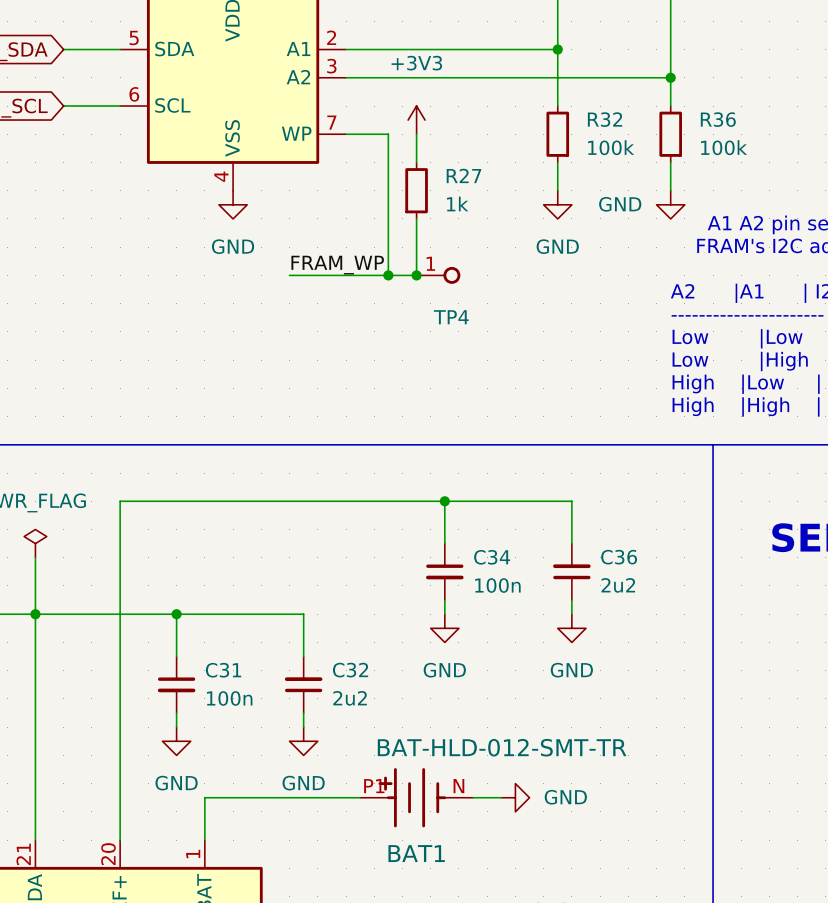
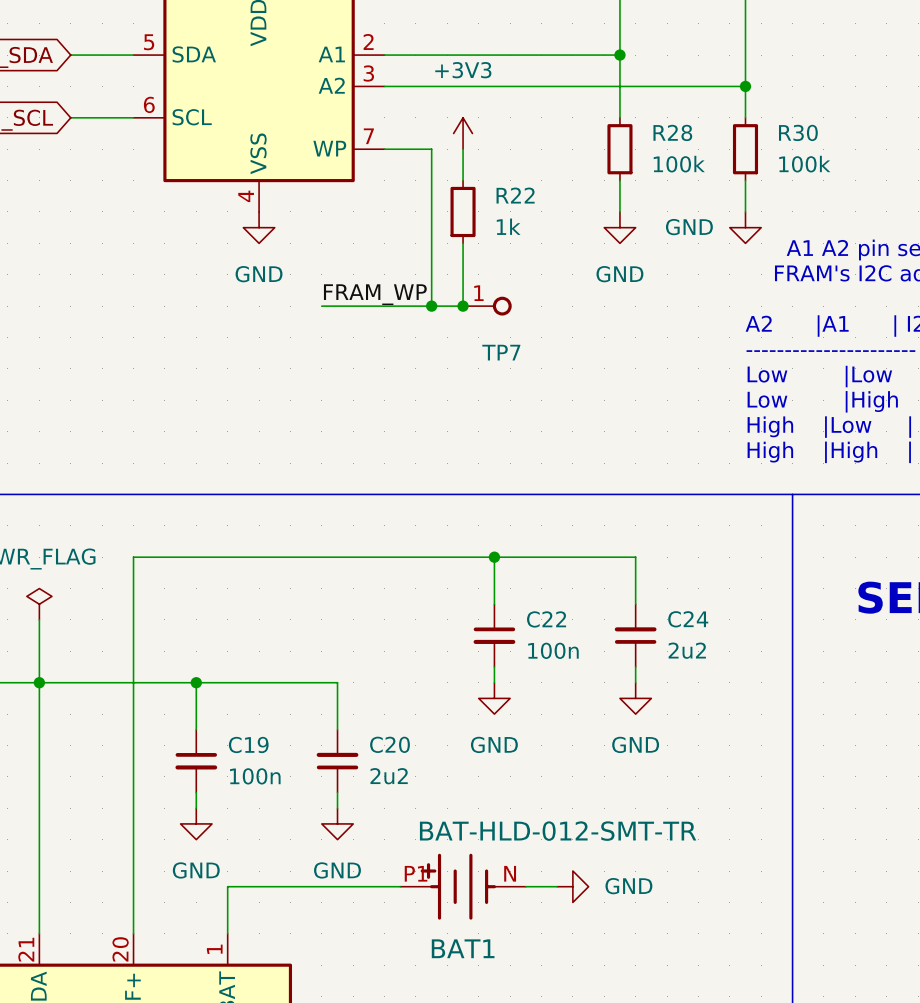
R32 name: R32 (605, 119) -> R28 (672, 132)
R36 name: R36 (718, 119) -> R30 (798, 132)
R27 name: R27 (463, 175) -> R22 (515, 195)
TP4 name: TP4 (451, 317) -> TP7 (501, 352)
C34 name: C34 (492, 557) -> C22 (546, 619)
C36 name: C36 (619, 557) -> C24 (688, 619)
C31 name: C31 (223, 670) -> C19 (248, 744)
C32 name: C32 (350, 670) -> C20 (389, 744)

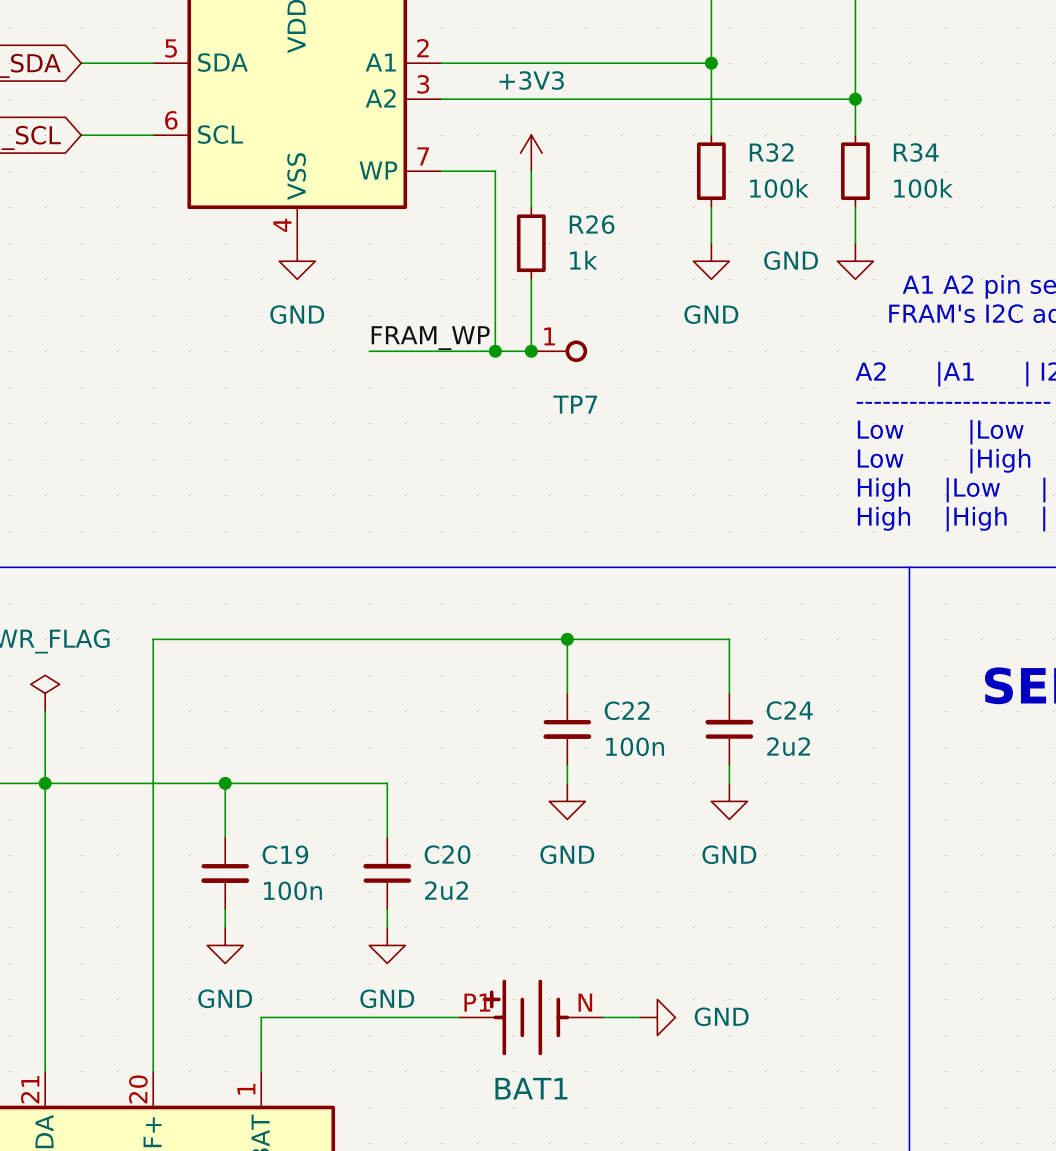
R28 name: R28 (672, 132) -> R32 (771, 152)
R30 name: R30 (798, 132) -> R34 (916, 152)
R22 name: R22 (515, 195) -> R26 (592, 224)
BAT1 value: BAT-HLD-012-SMT-TR (558, 831) -> none

